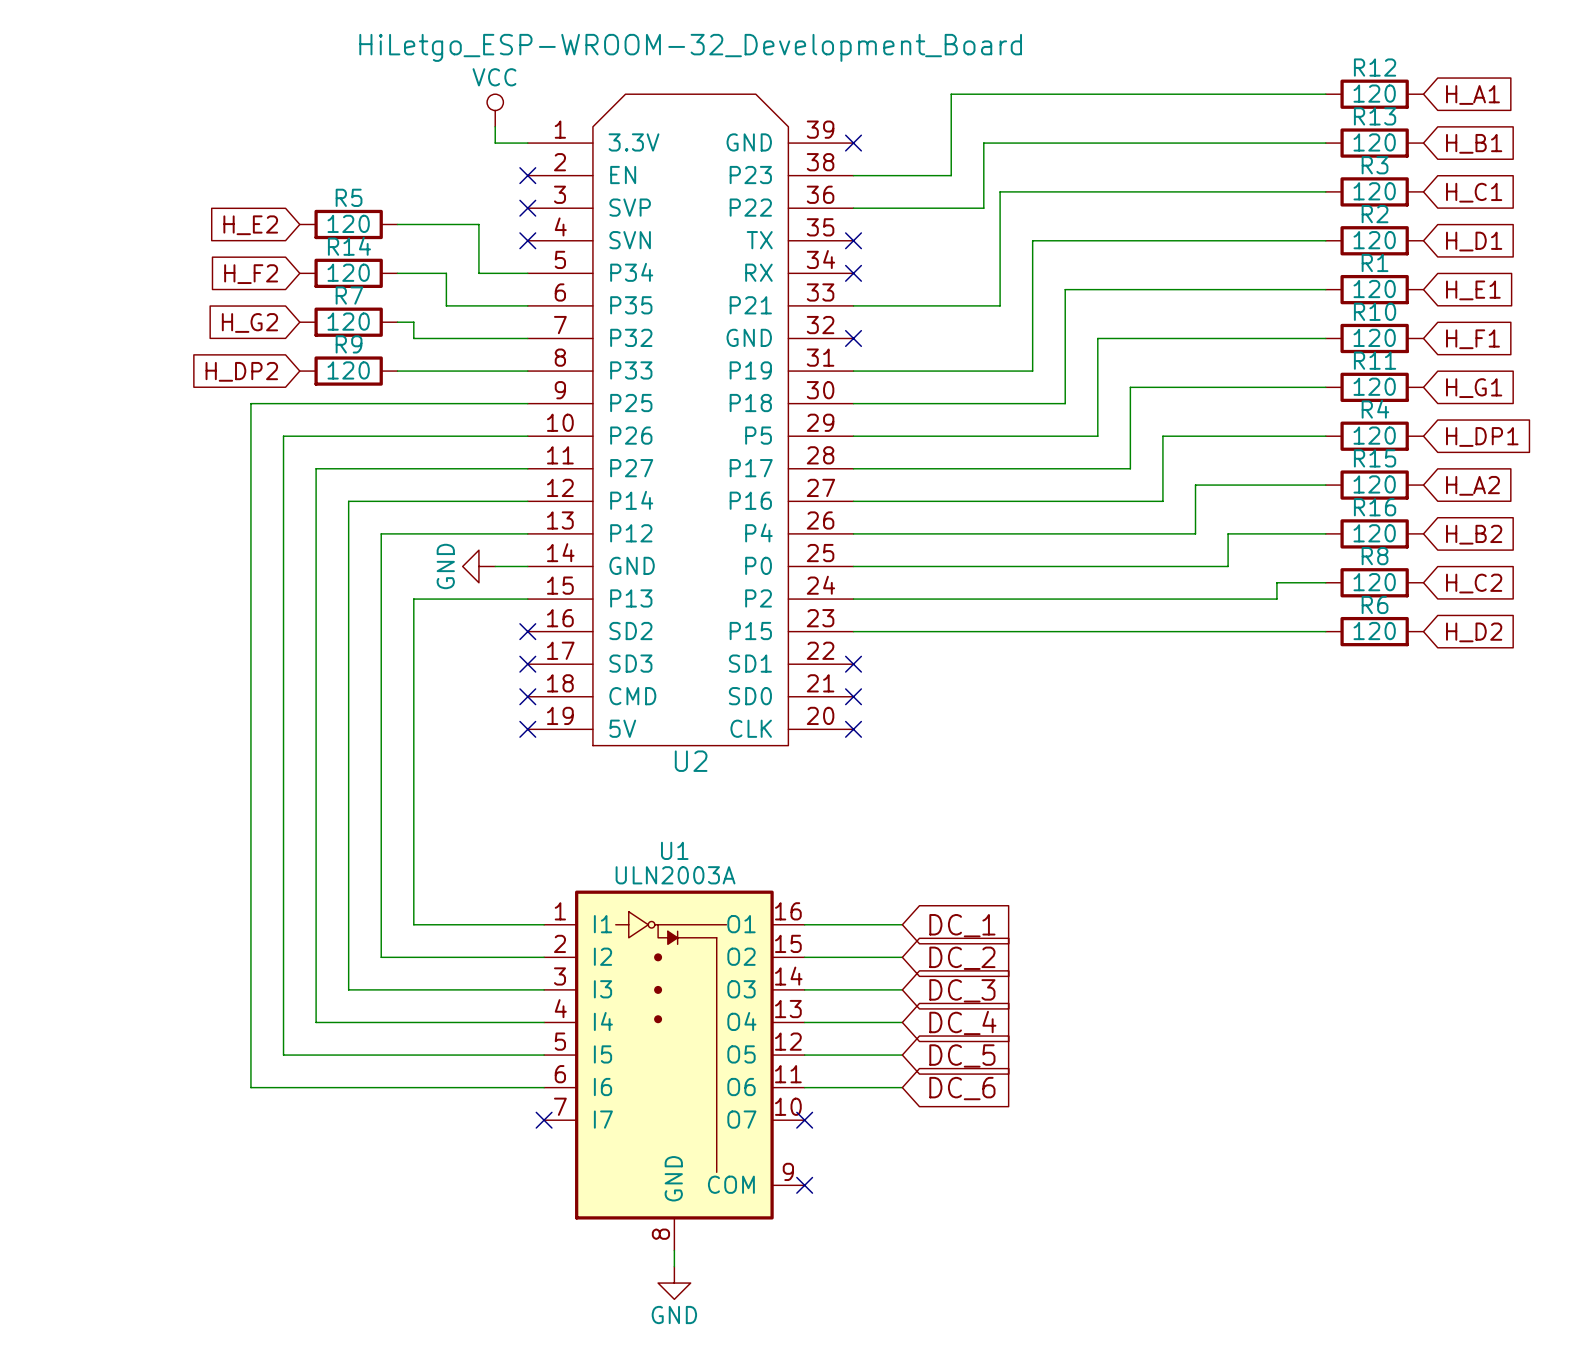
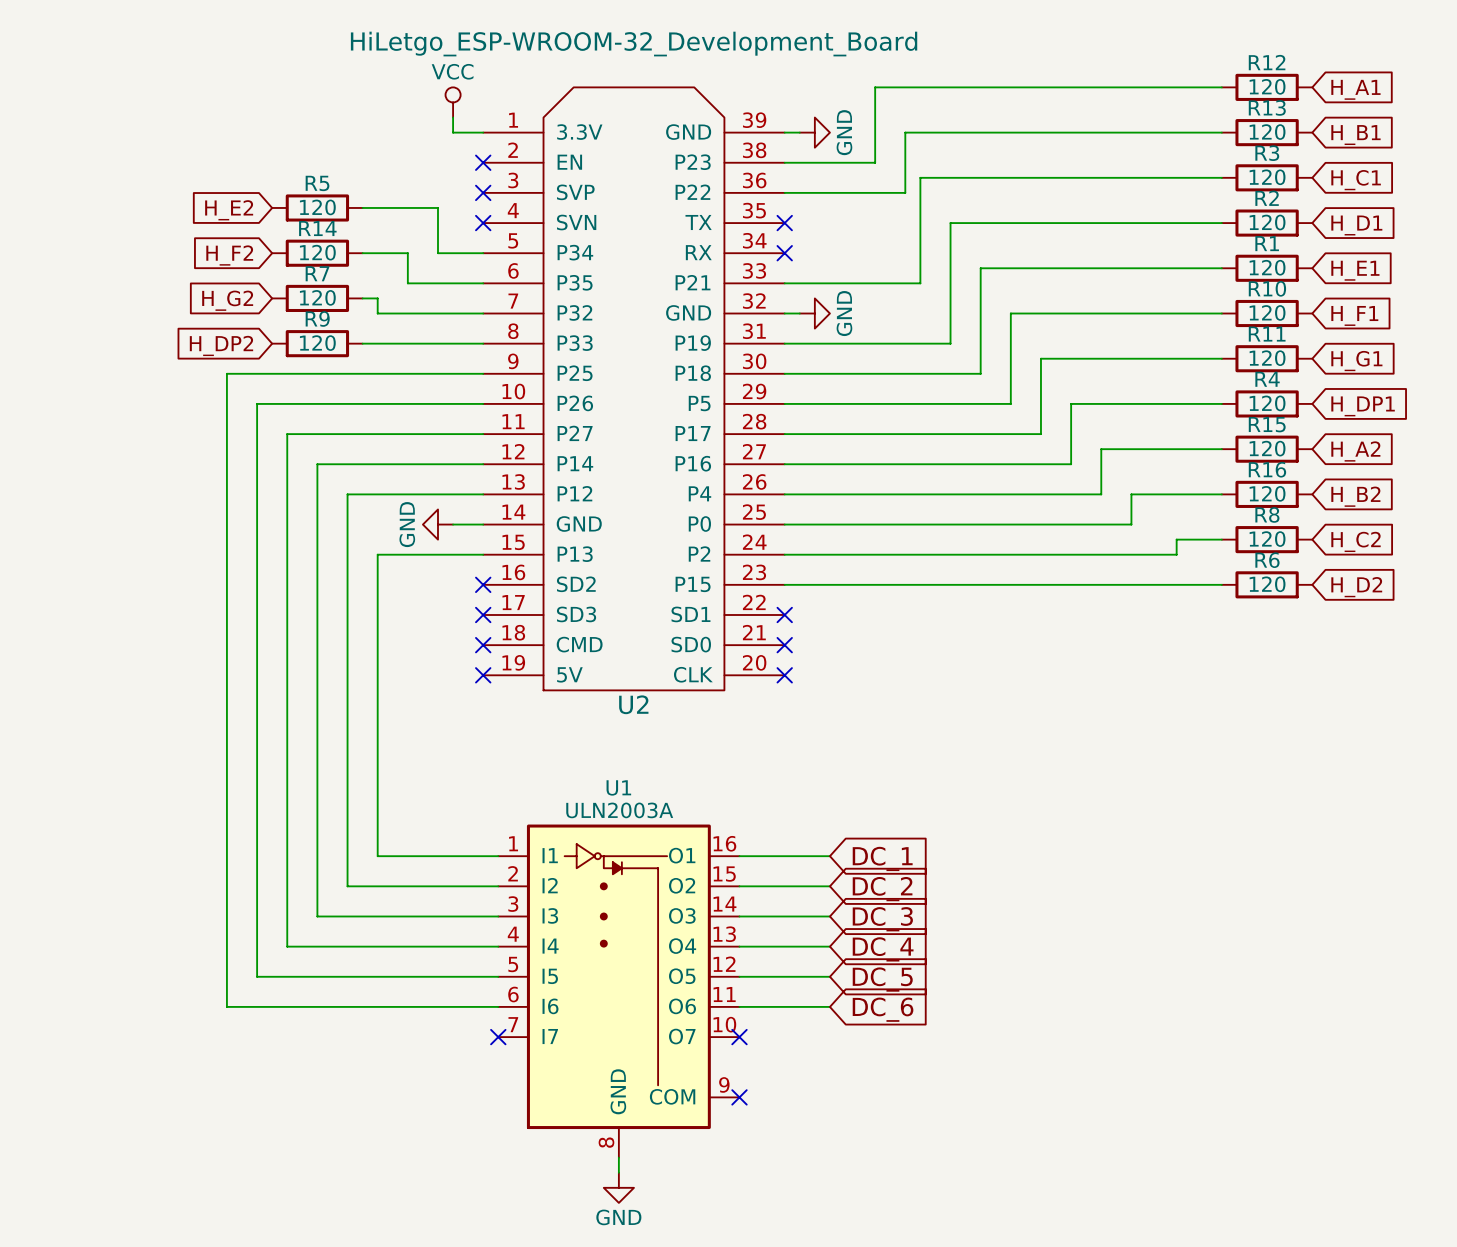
wire: none -> (784, 132) (799, 132)
no-connect mark: (853, 143) -> none
power symbol: none -> GND (814, 132)
wire: none -> (784, 313) (799, 313)
no-connect mark: (853, 338) -> none
power symbol: none -> GND (814, 313)

